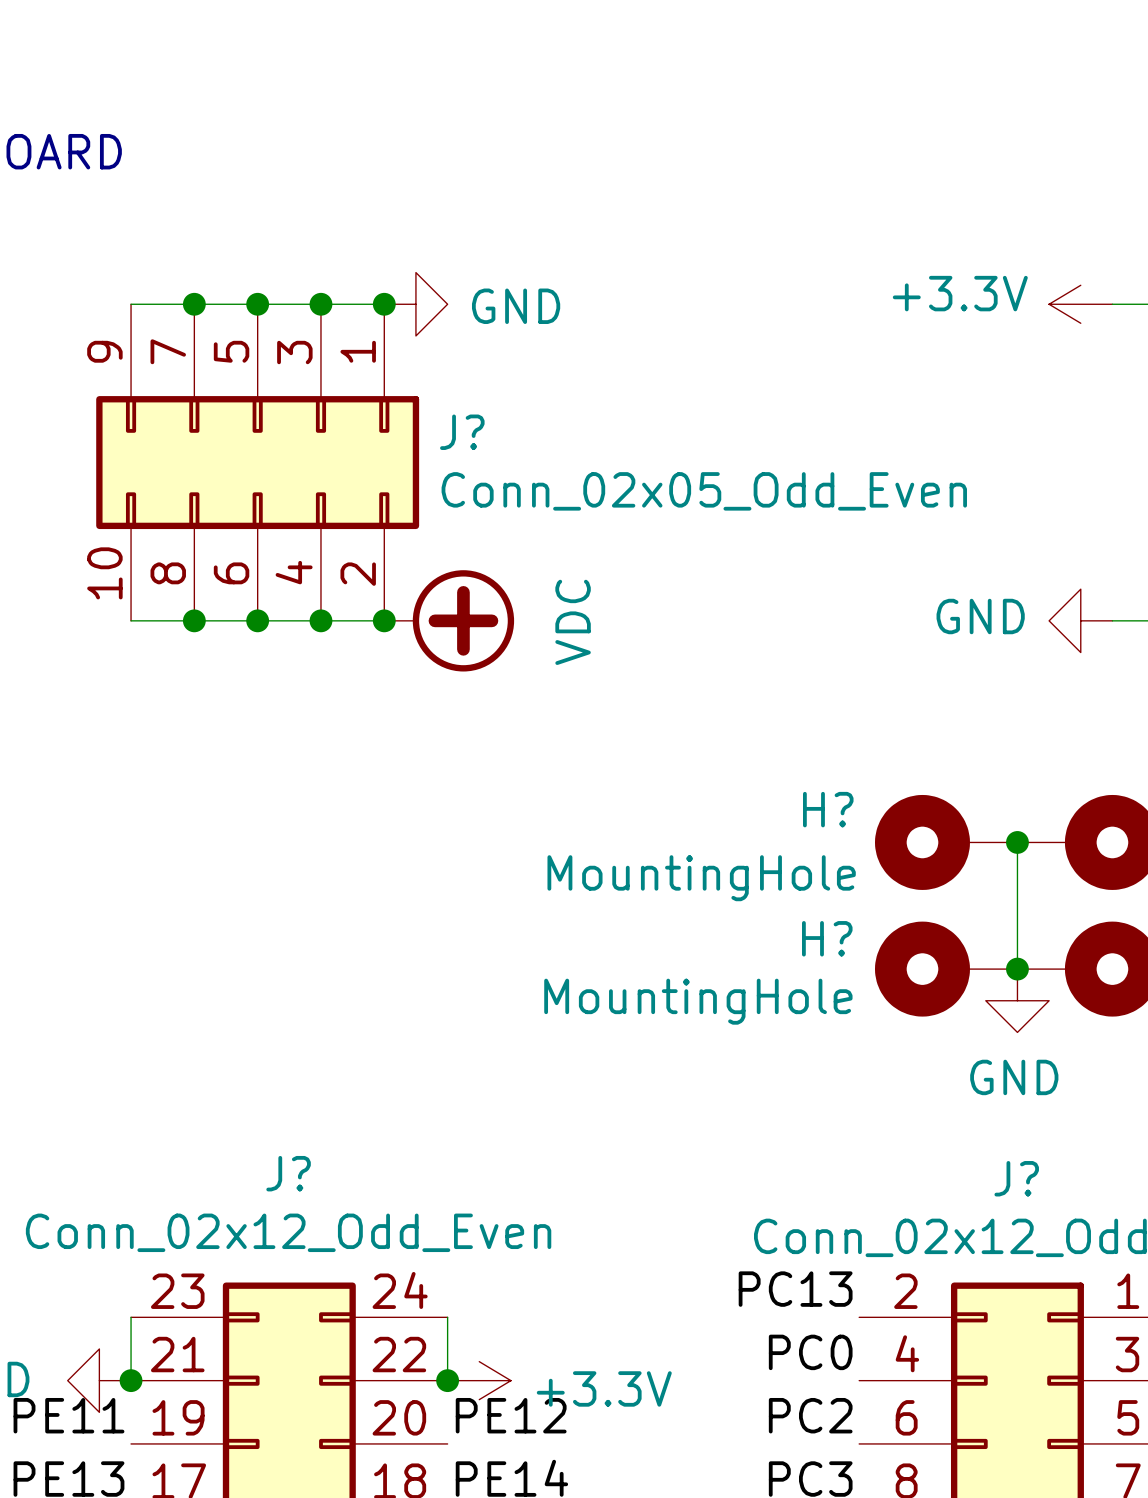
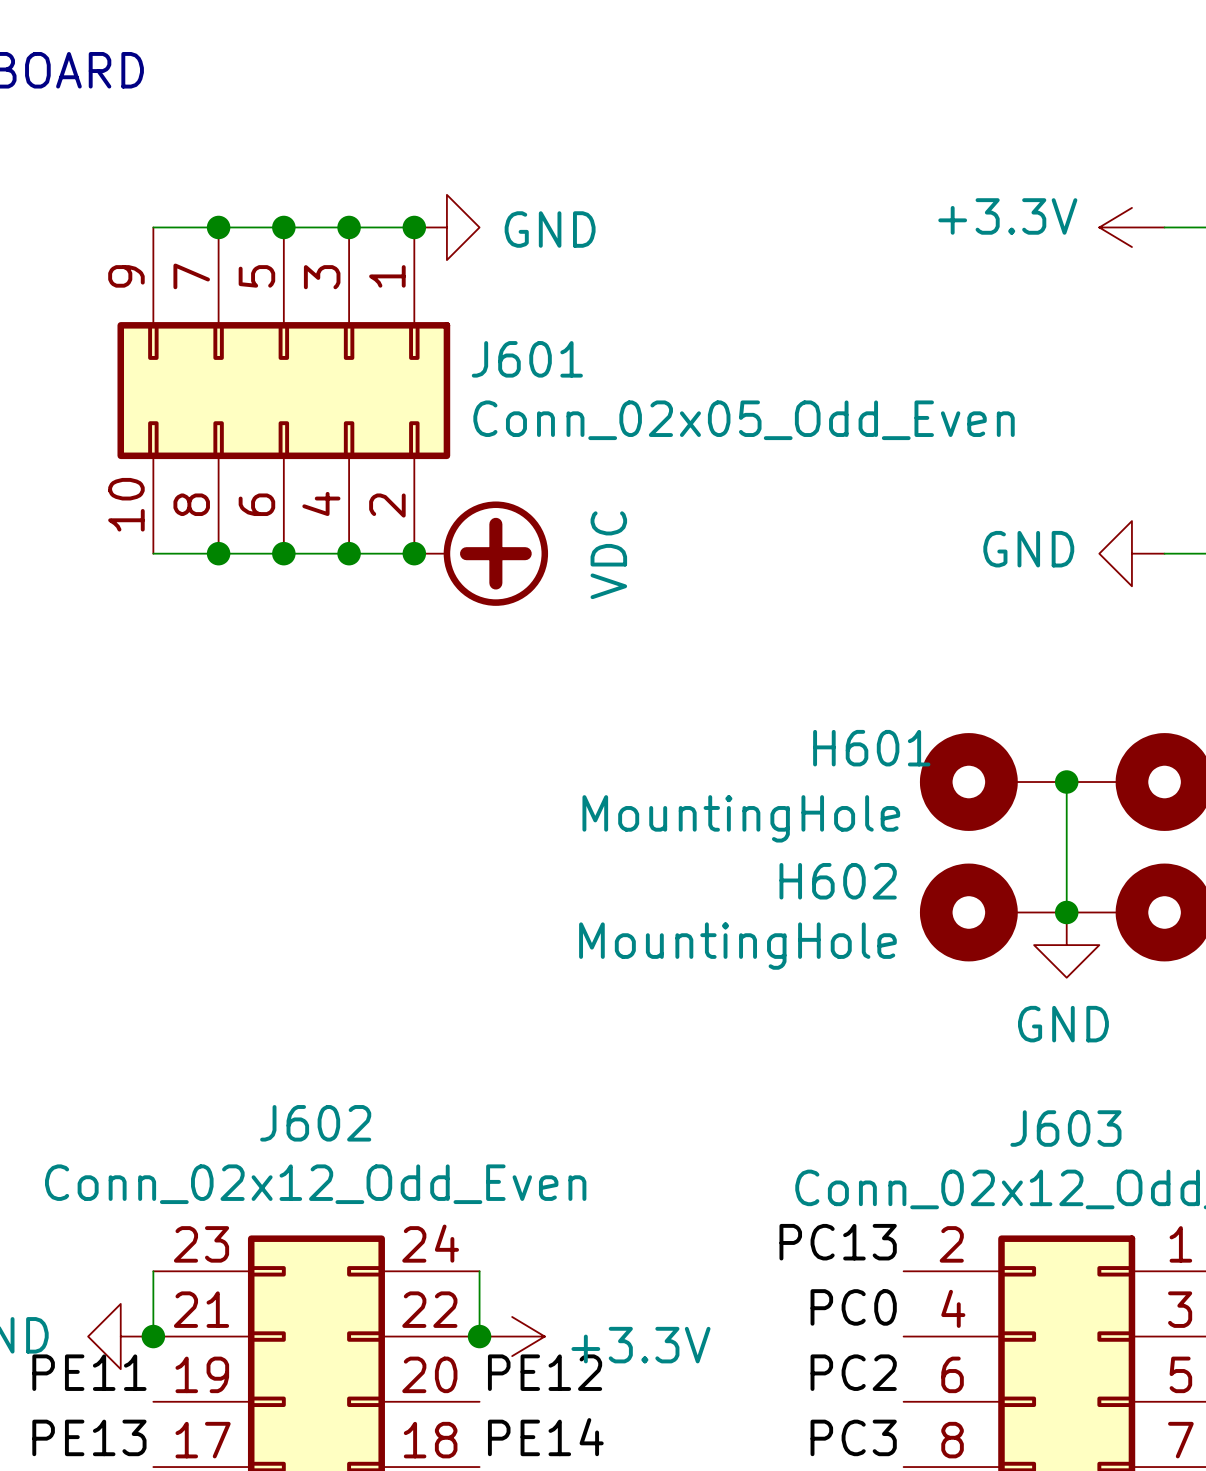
J? name: J? (462, 432) -> J601 (527, 359)
H? name: H? (828, 809) -> H601 (871, 748)
H? name: H? (827, 938) -> H602 (838, 881)
J? name: J? (288, 1173) -> J602 (315, 1123)
J? name: J? (1016, 1178) -> J603 (1065, 1128)

